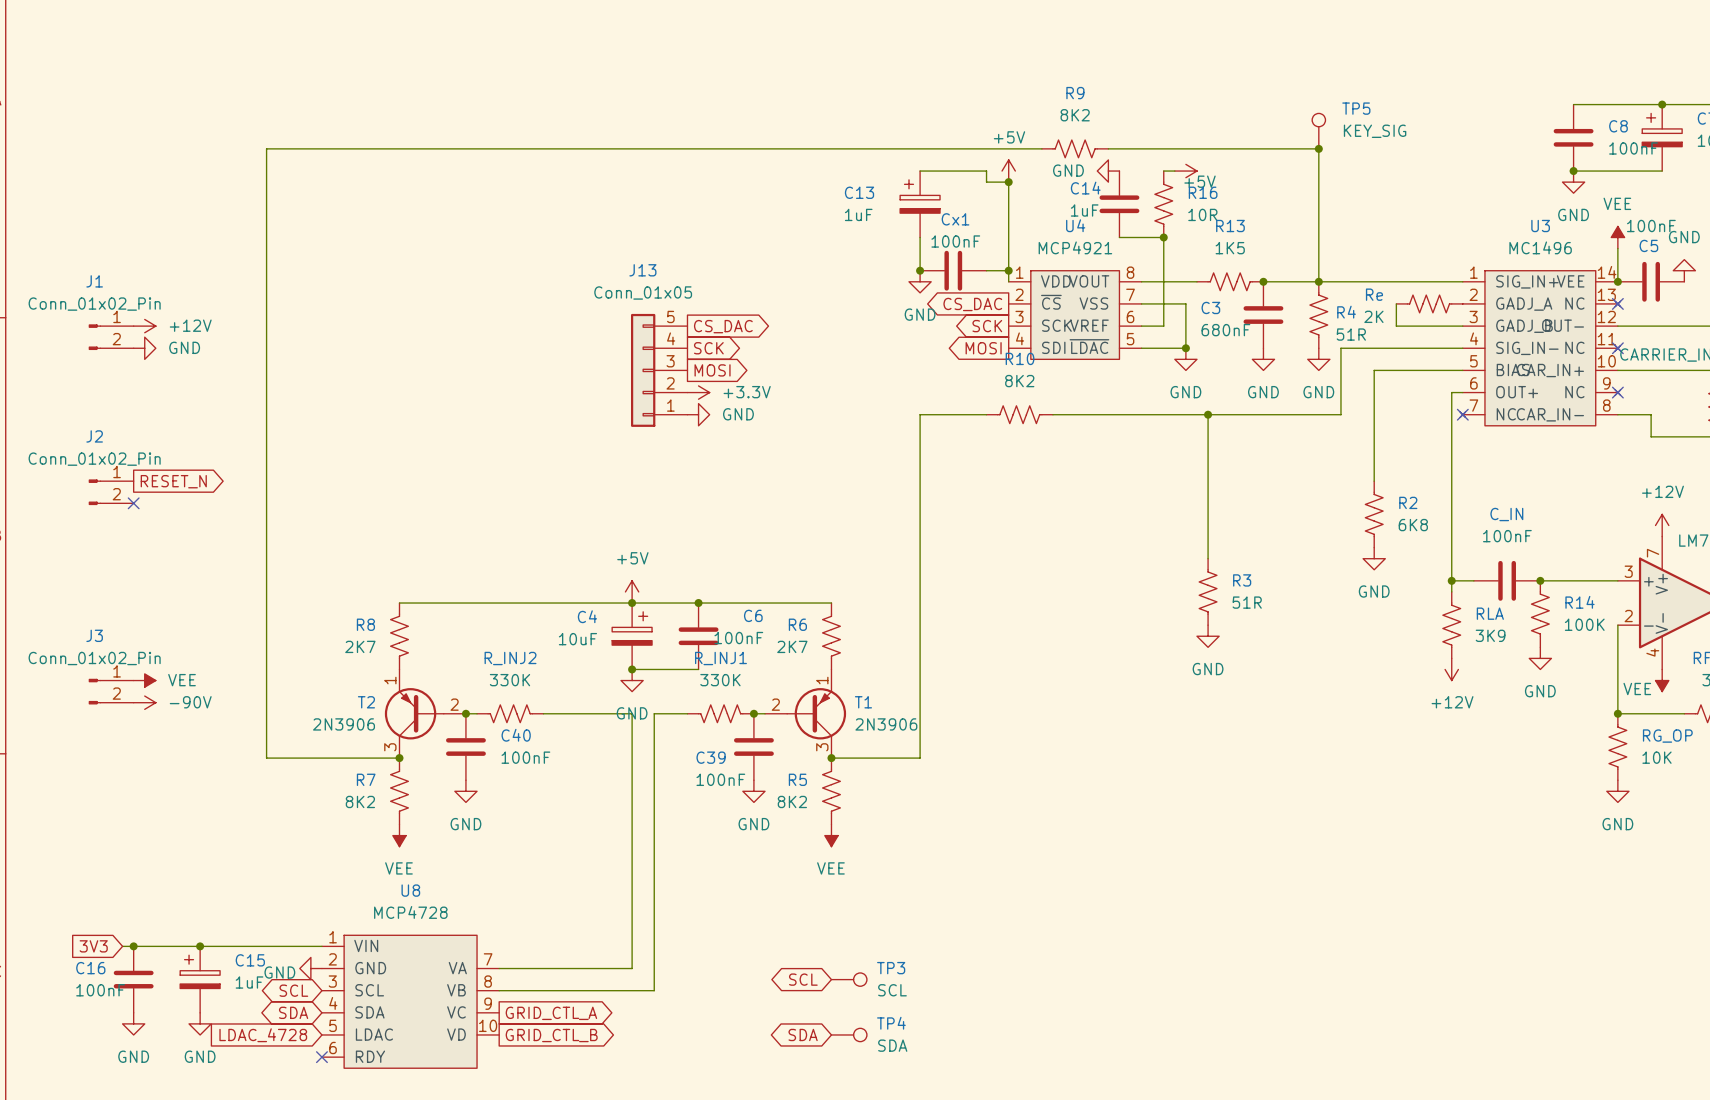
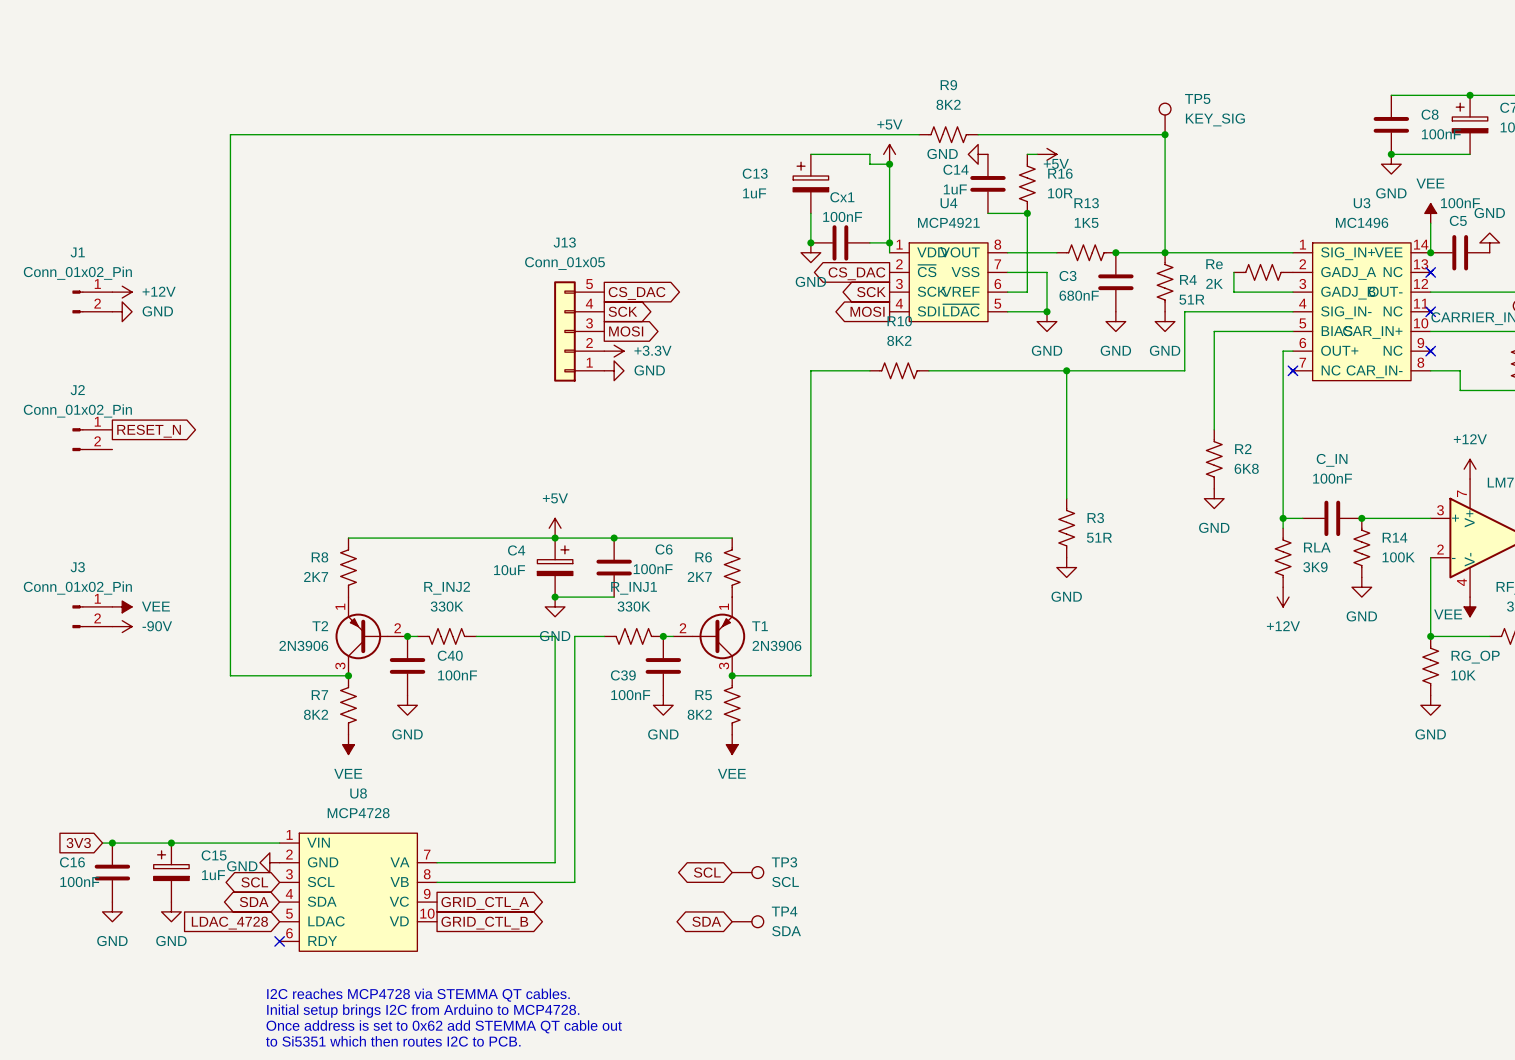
no-connect mark: (133, 503) -> none

